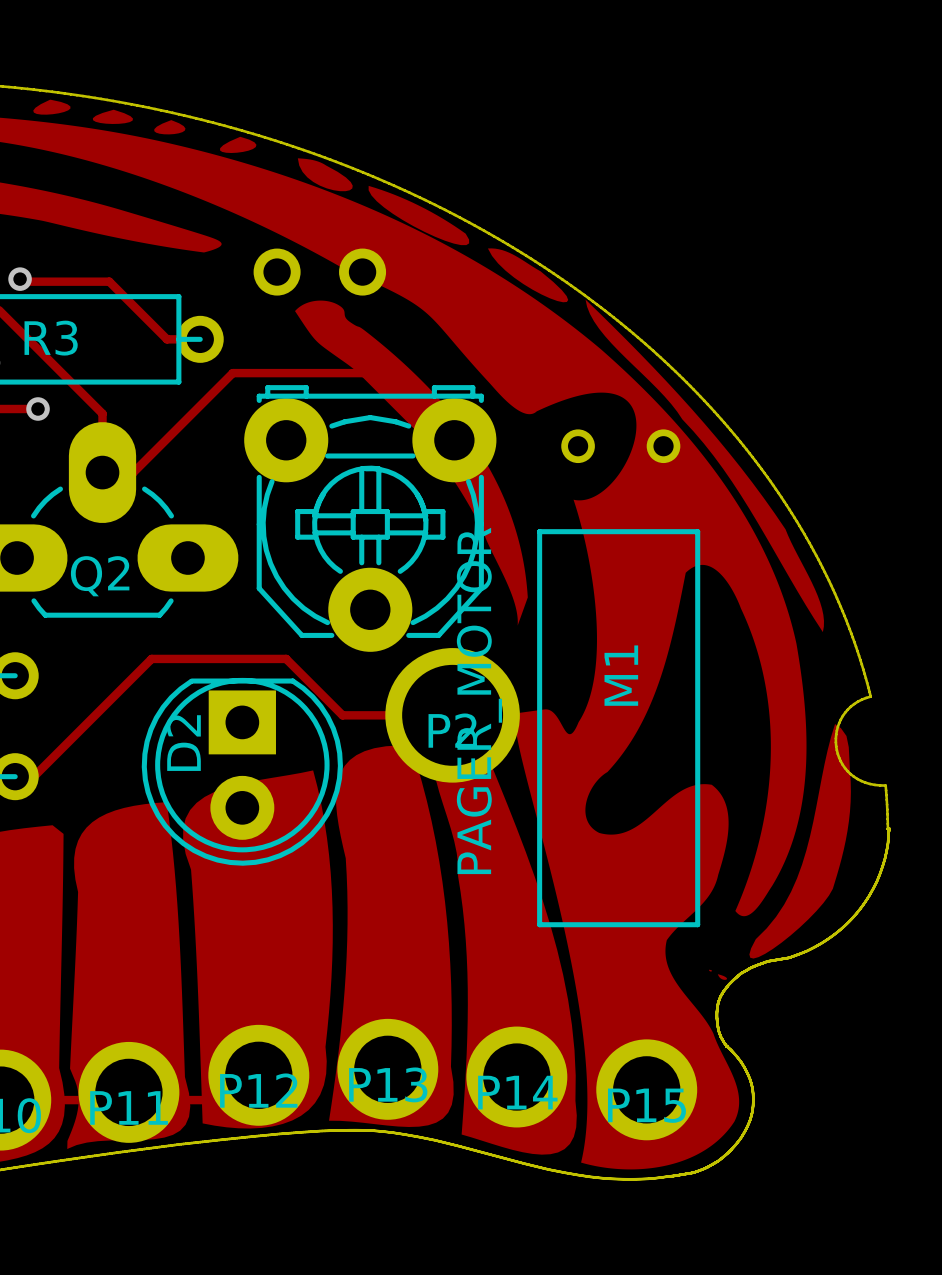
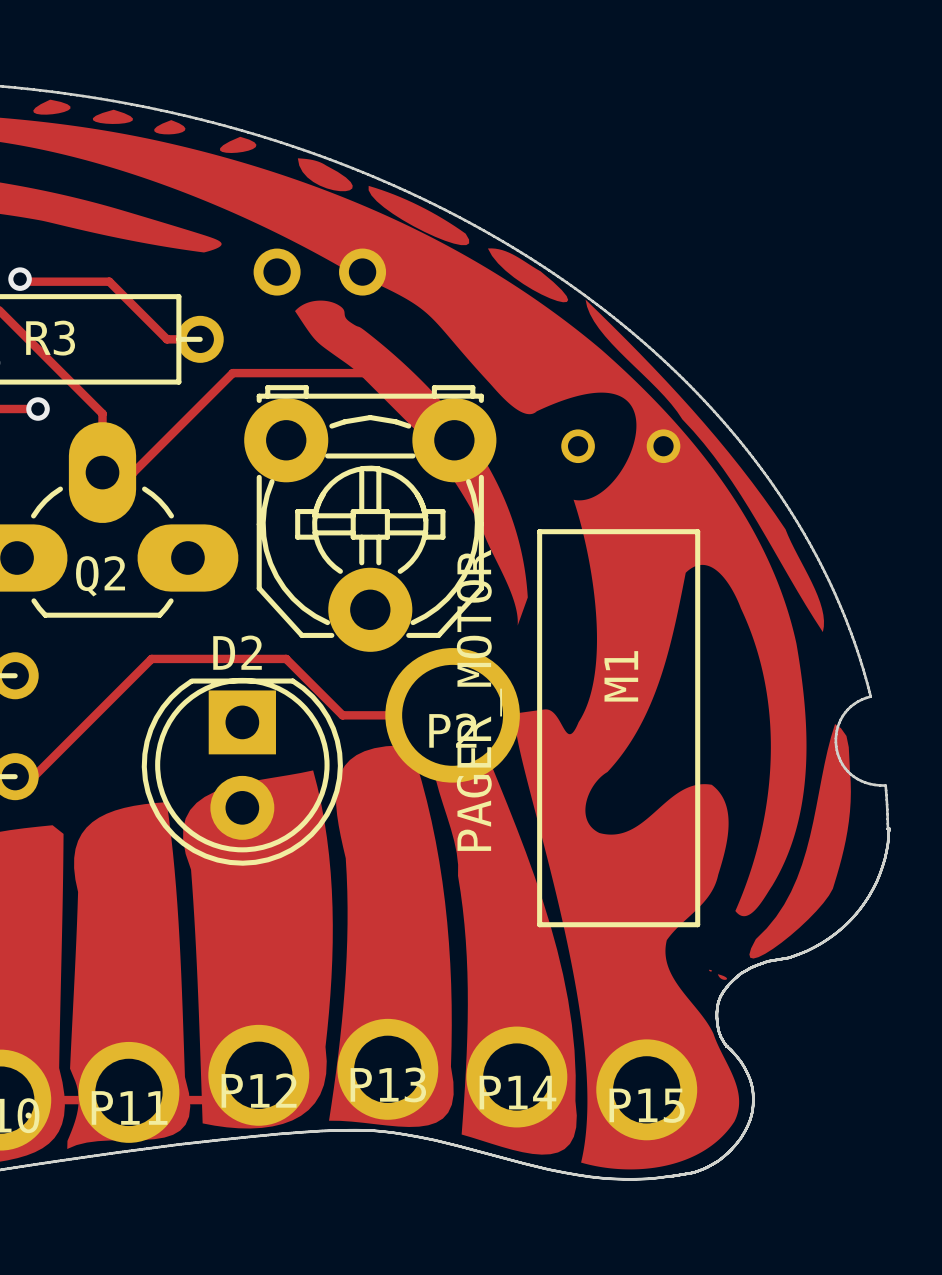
D2 name rotation: 0° (183, 743) -> 90° clockwise (237, 652)
D2 name position: D2 (183, 743) -> D2 (237, 652)

